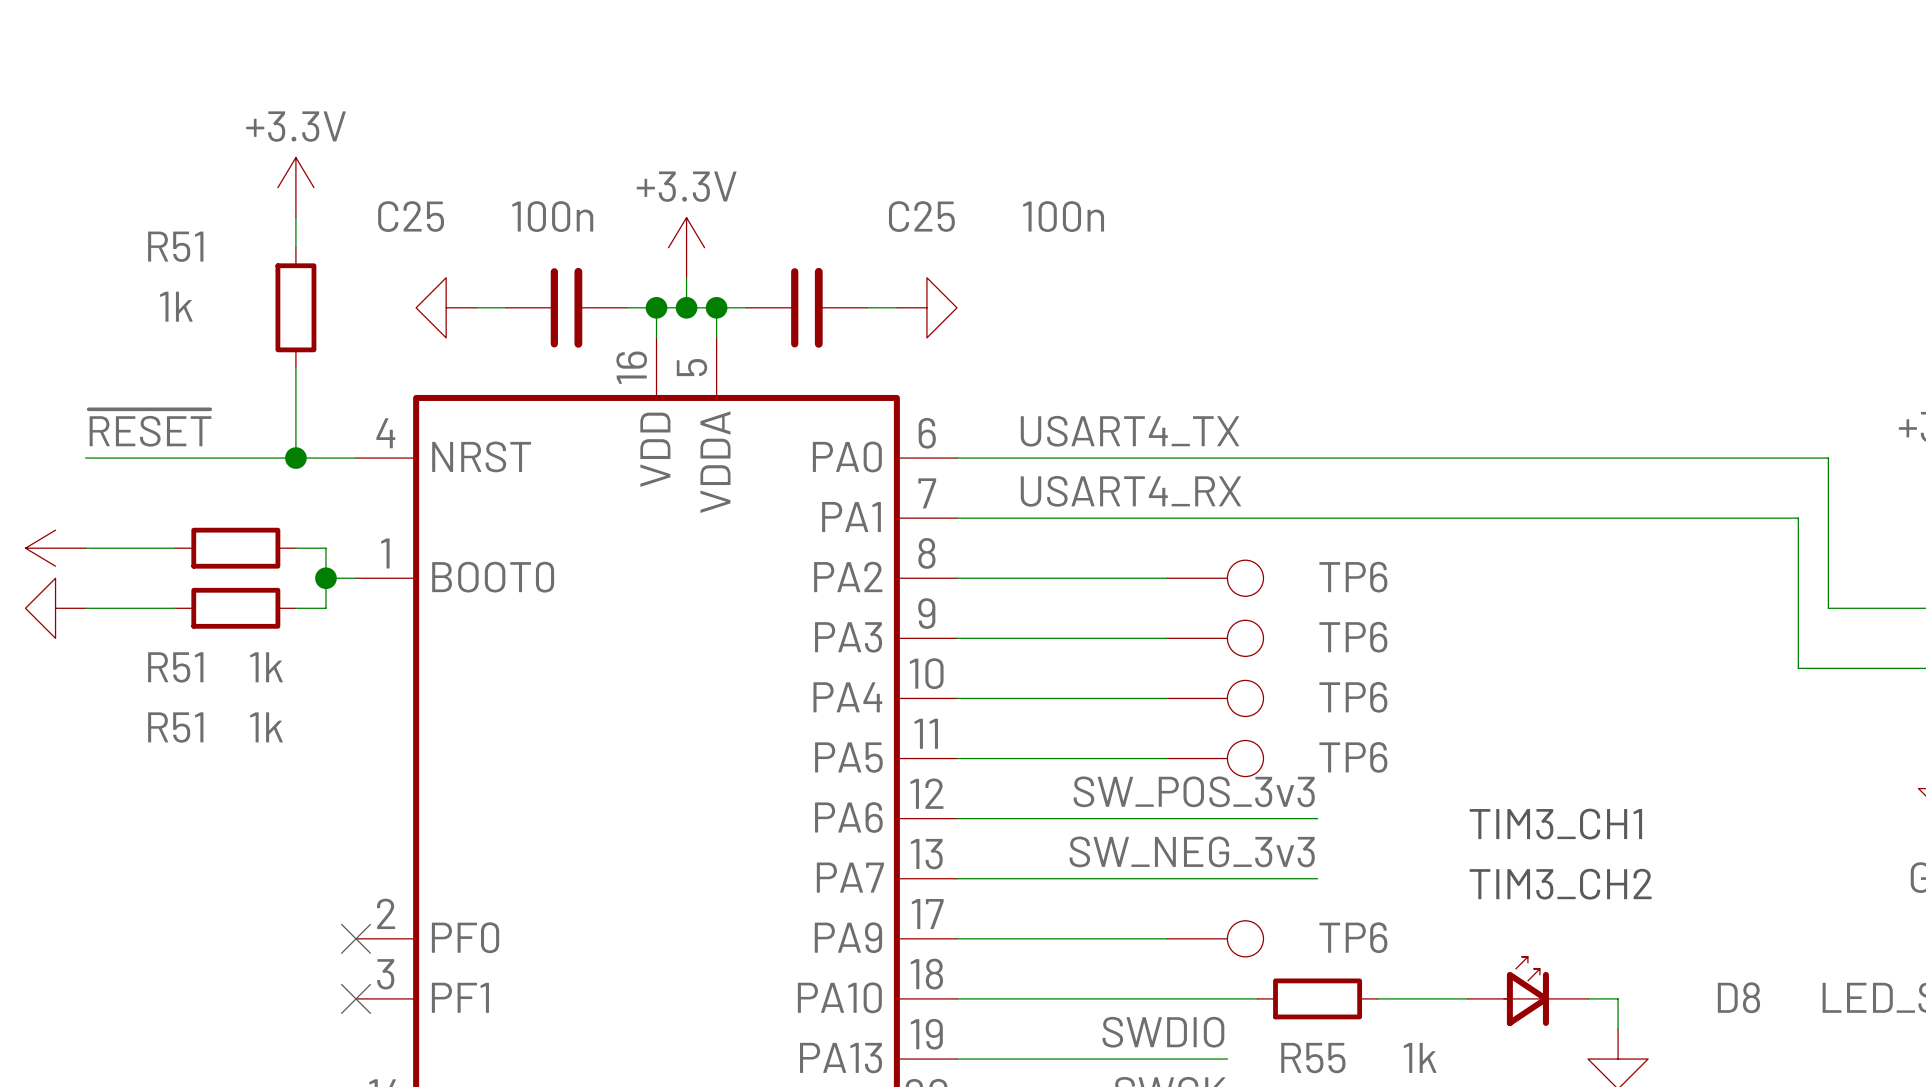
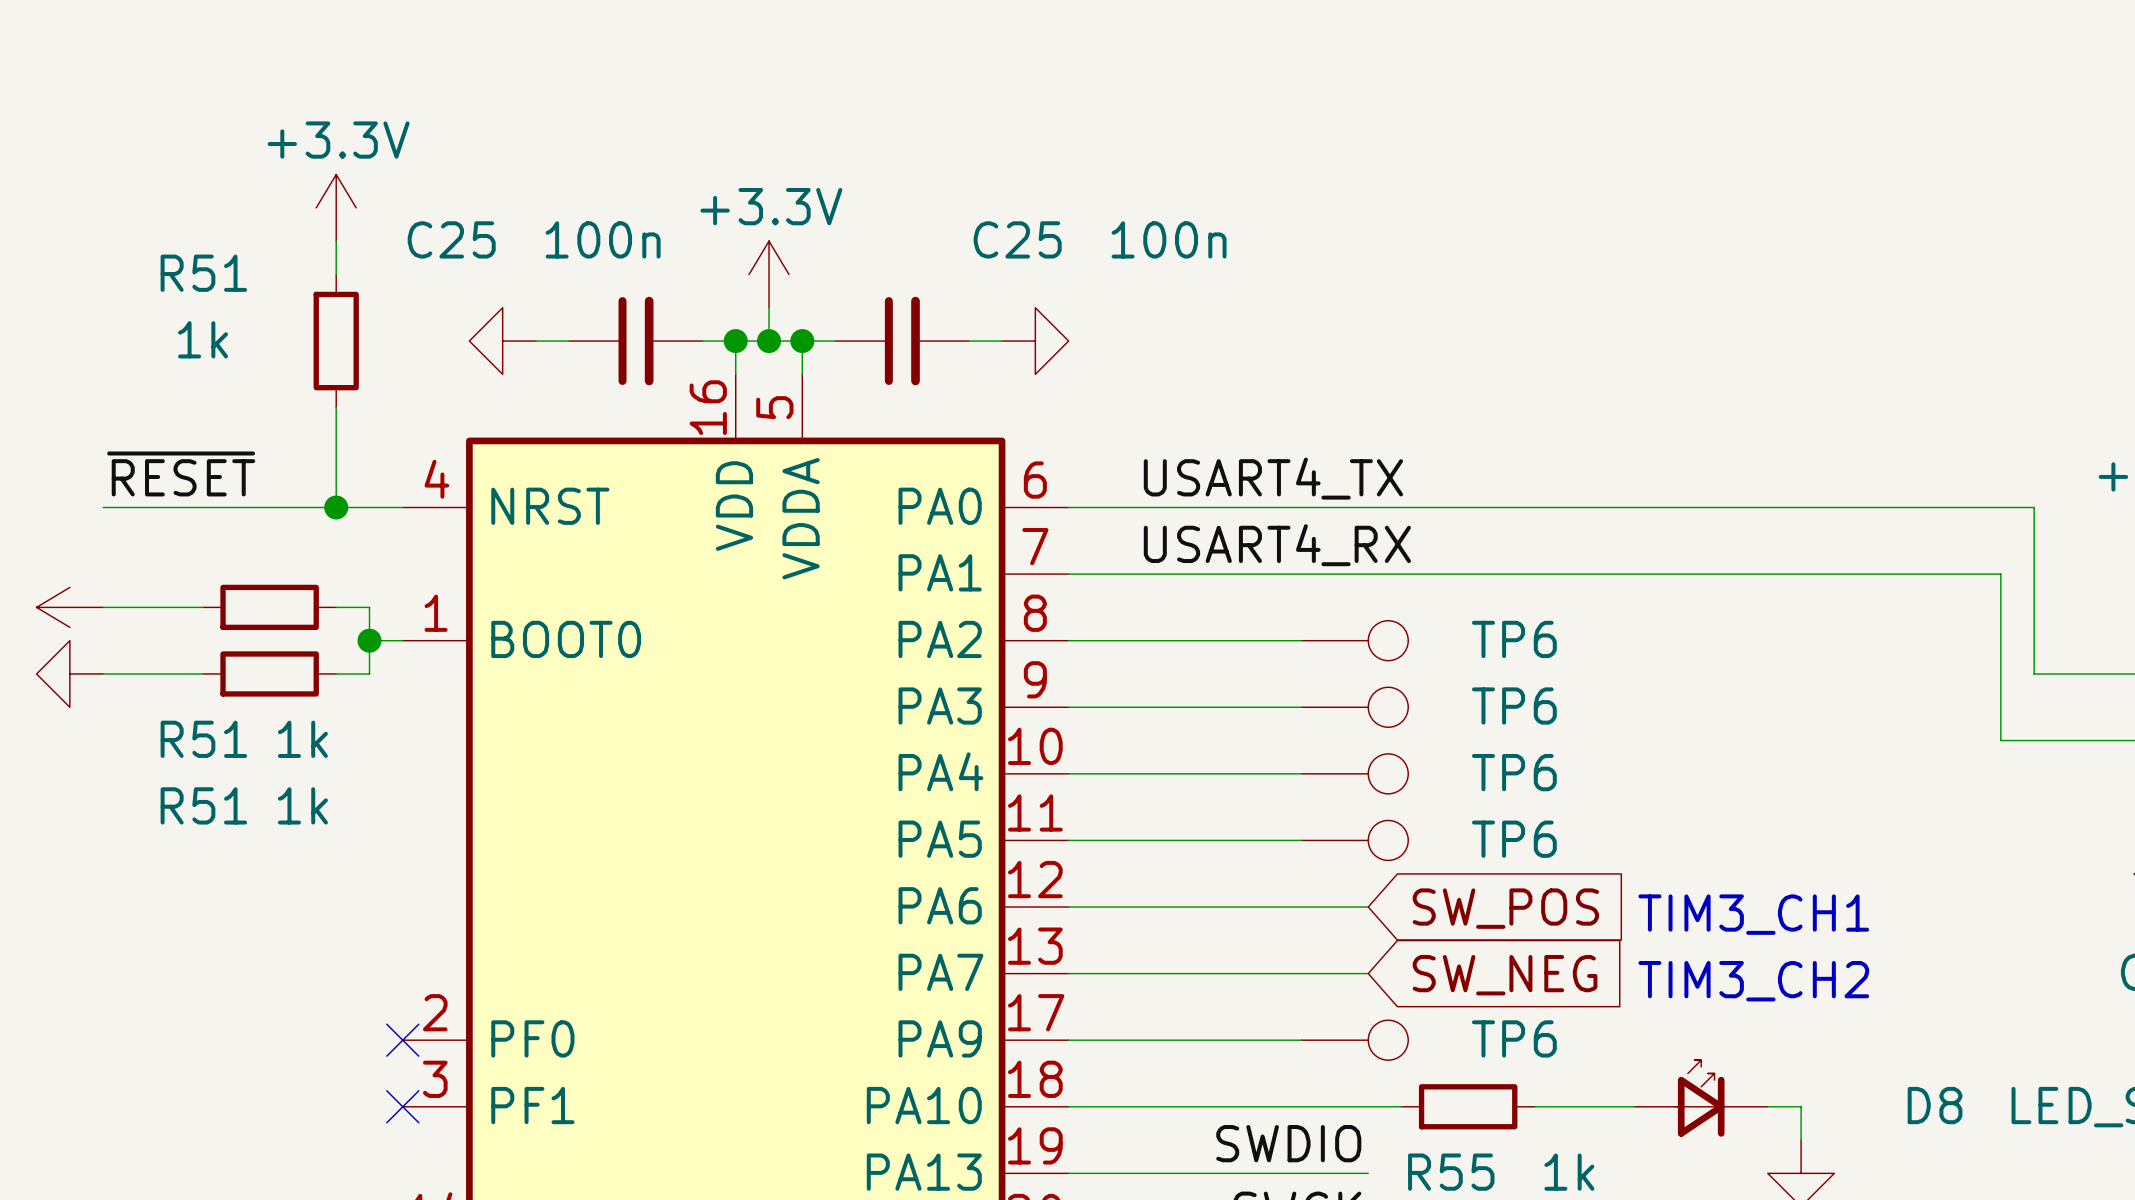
label: SW_POS_3v3 (1194, 791) -> none
wire: (1227, 818) (1317, 818) -> none
global label: none -> SW_POS (1505, 908)
label: SW_NEG_3v3 (1192, 851) -> none
wire: (1227, 878) (1317, 878) -> none
global label: none -> SW_NEG (1505, 975)

